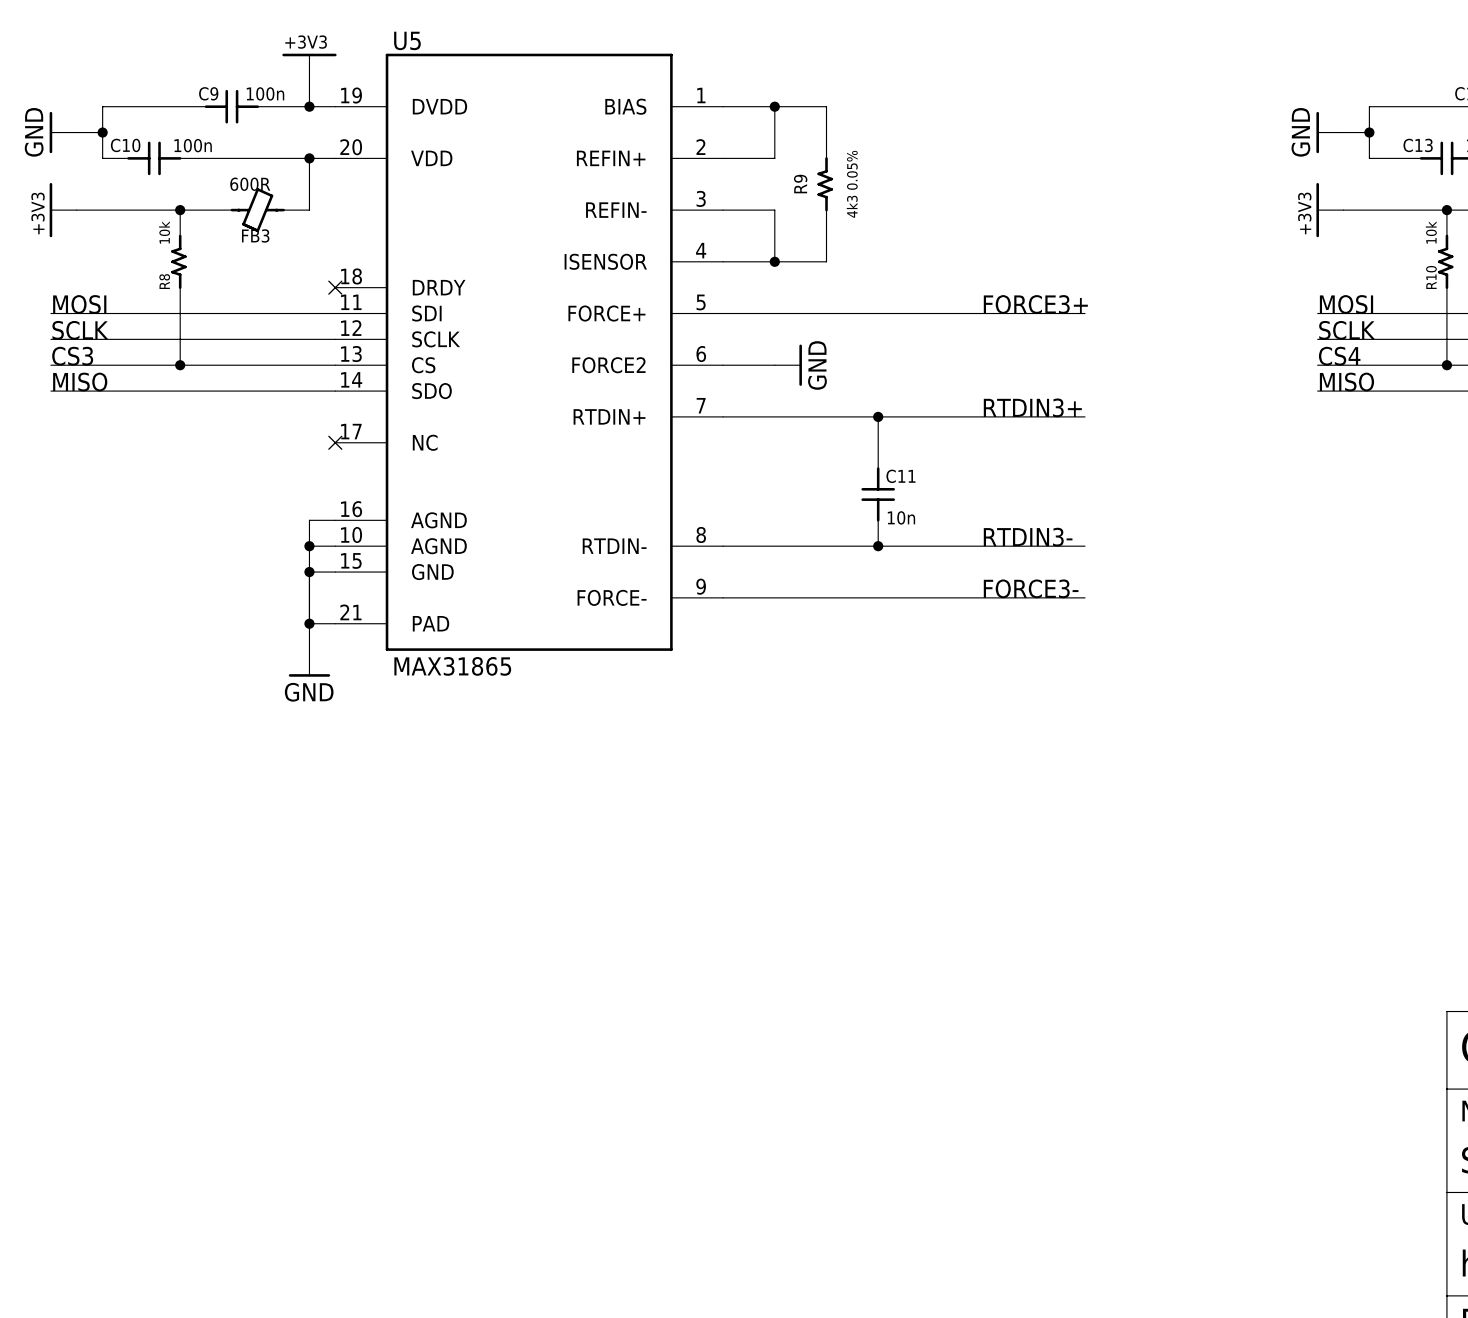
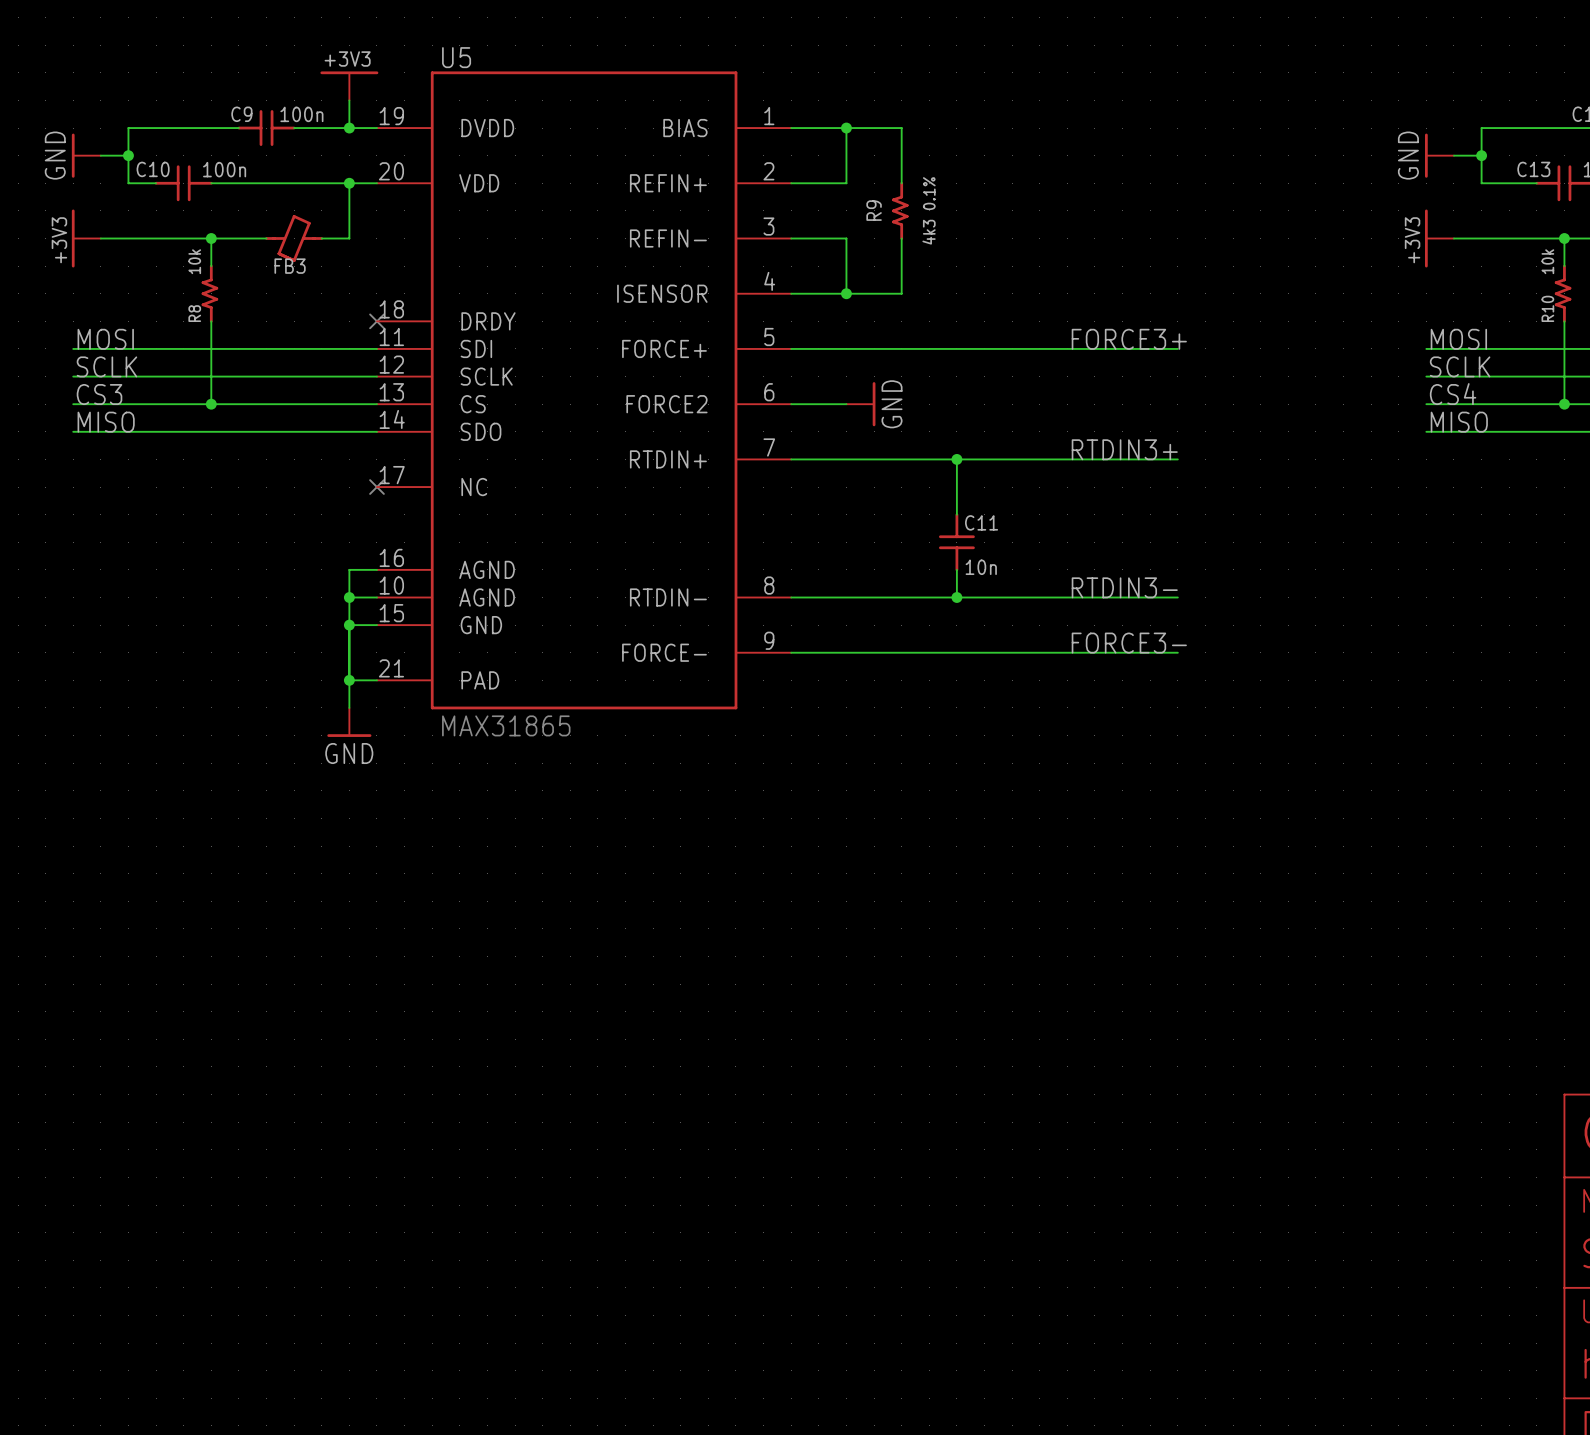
FB3 value: 600R (250, 184) -> none
R9 value: 4k3 0.05% (852, 184) -> 4k3 0.1% (929, 210)

